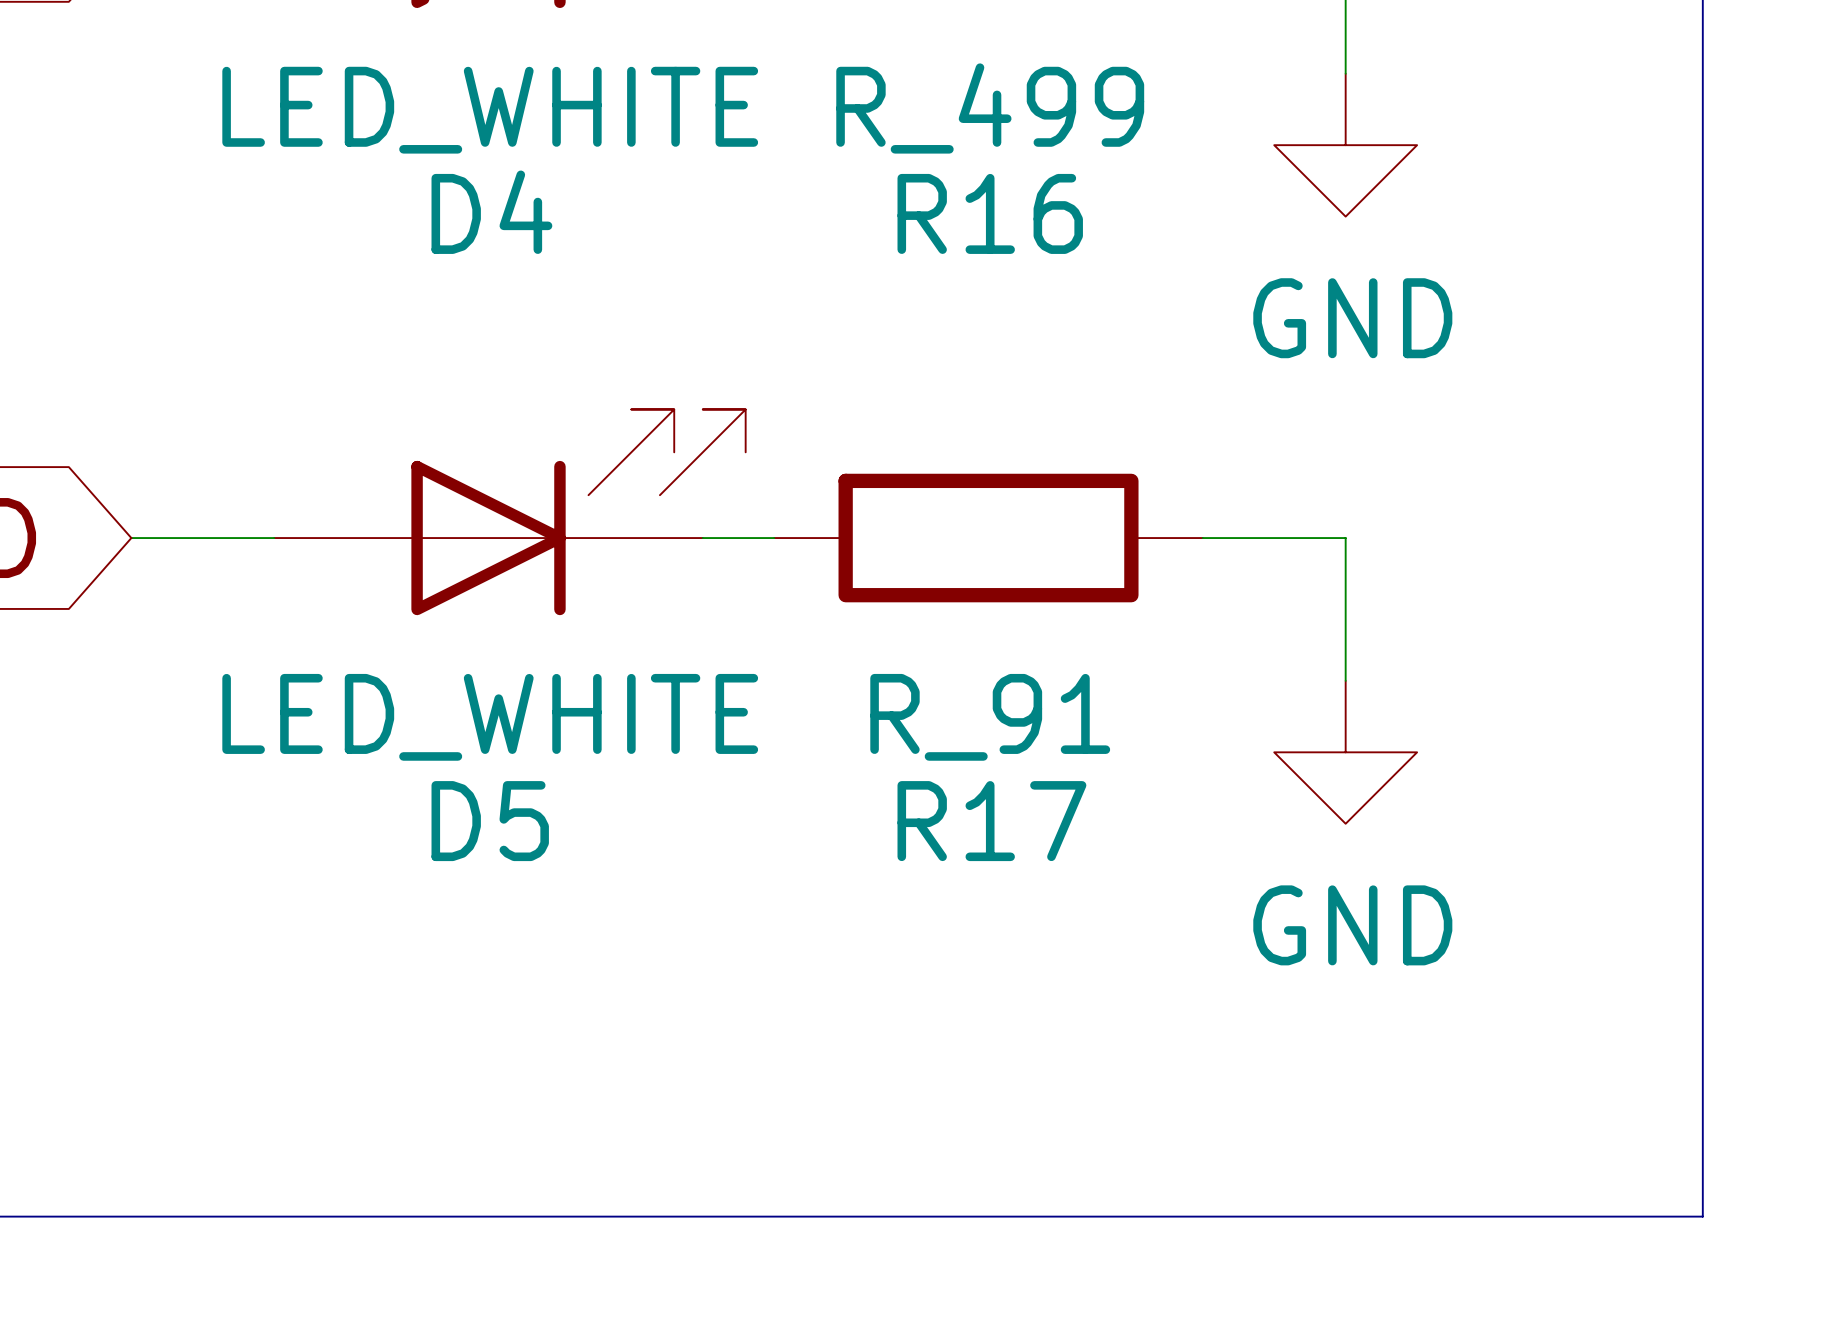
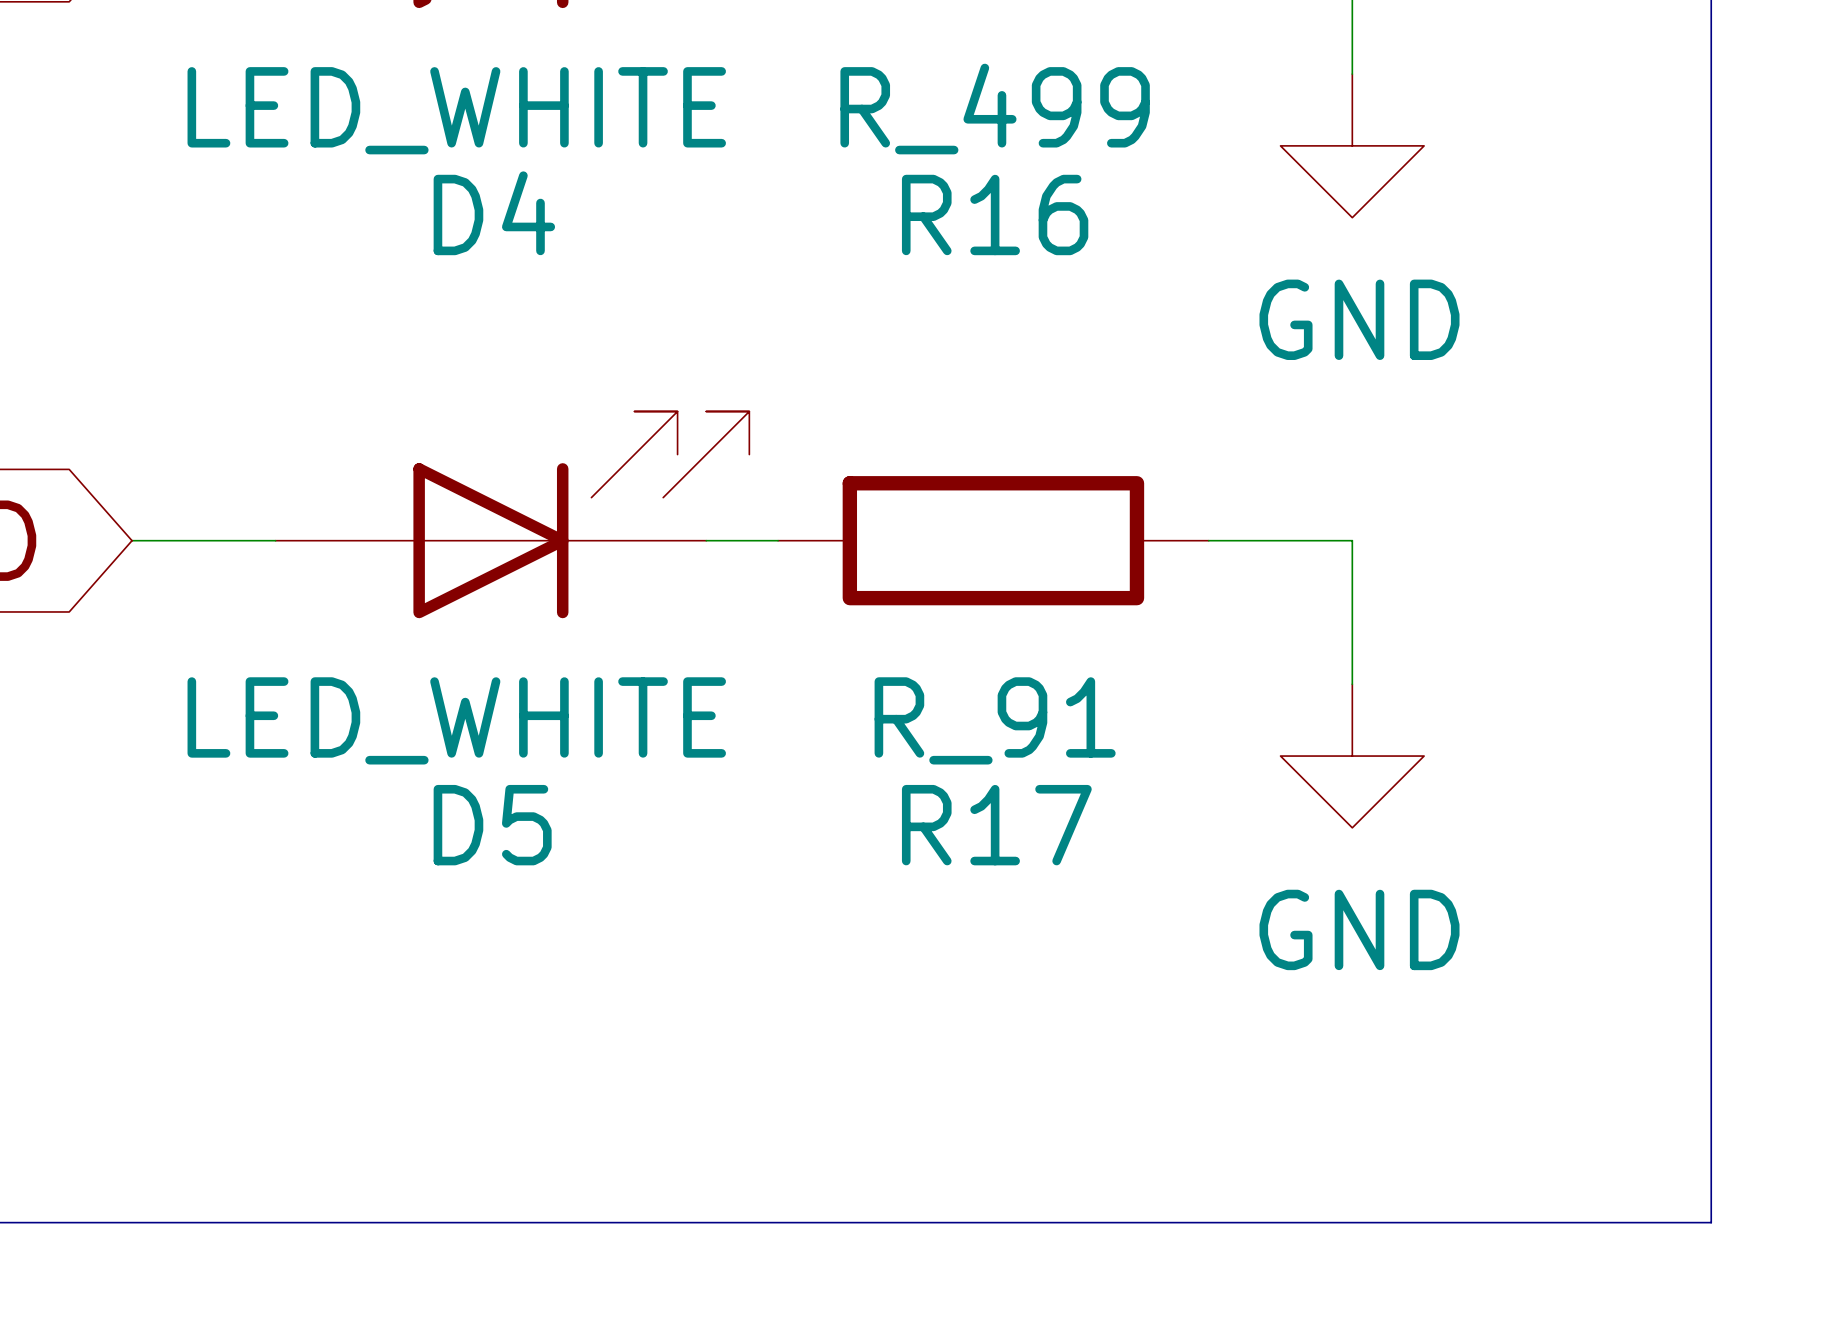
D4 value position: LED_WHITE (490, 110) -> LED_WHITE (456, 110)
D5 value position: LED_WHITE (490, 717) -> LED_WHITE (456, 720)

